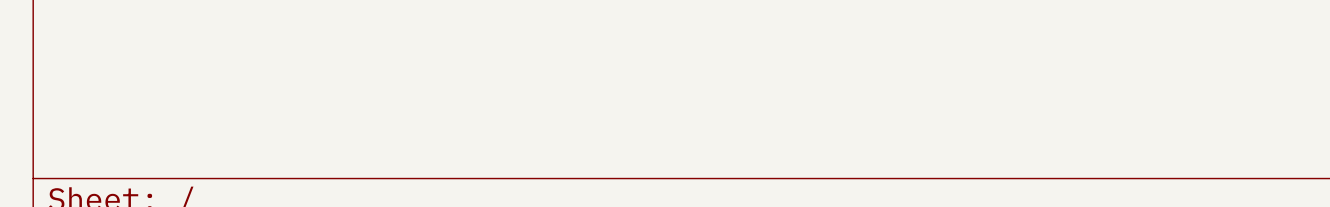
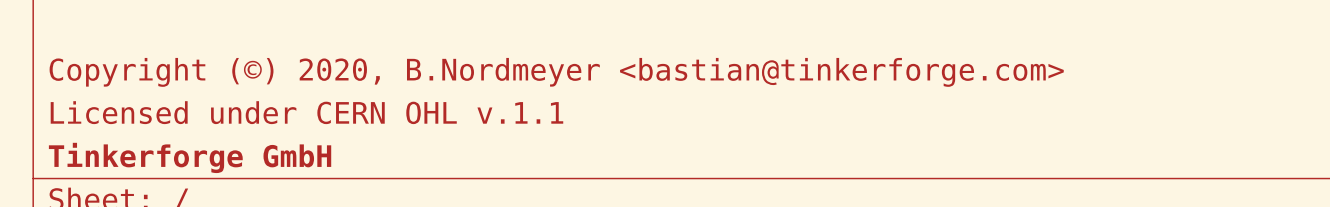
title block: none -> Copyright (©) 2020, B.Nordmeyer <bastian@tinkerforge.com> (556, 72)
title block: none -> Licensed under CERN OHL v.1.1 (306, 112)
title block: none -> Tinkerforge GmbH (190, 157)

